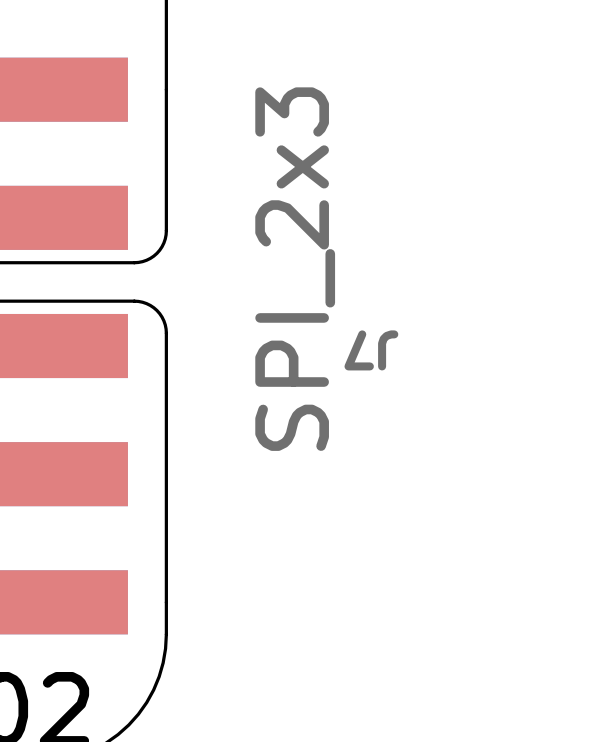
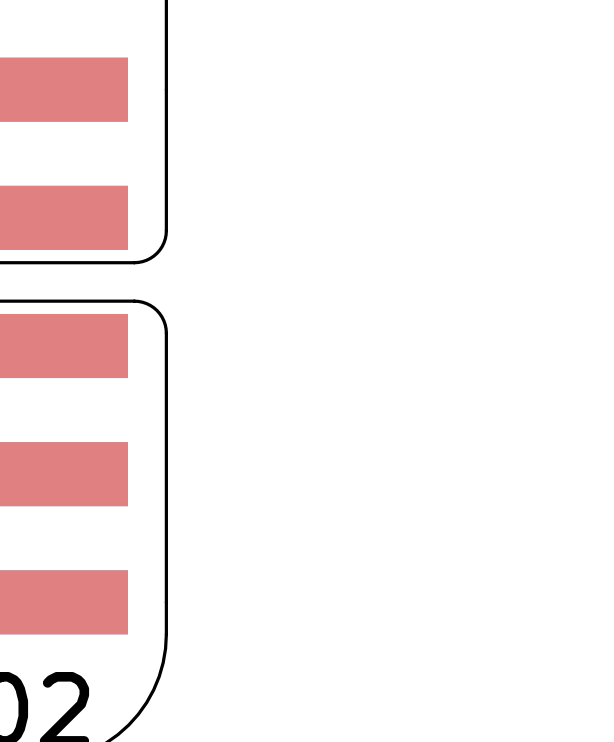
J7 value: SPI_2x3 (295, 269) -> none
J7 name: J7 (371, 350) -> none

